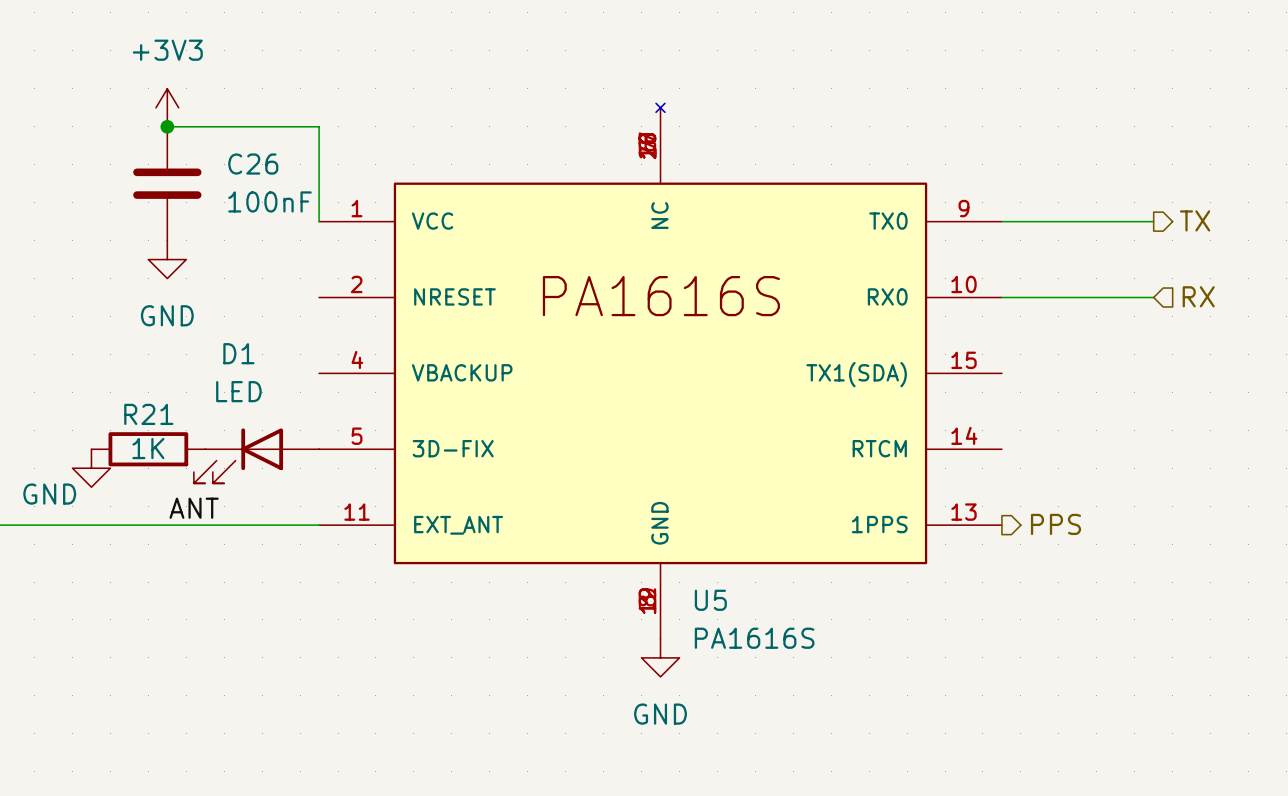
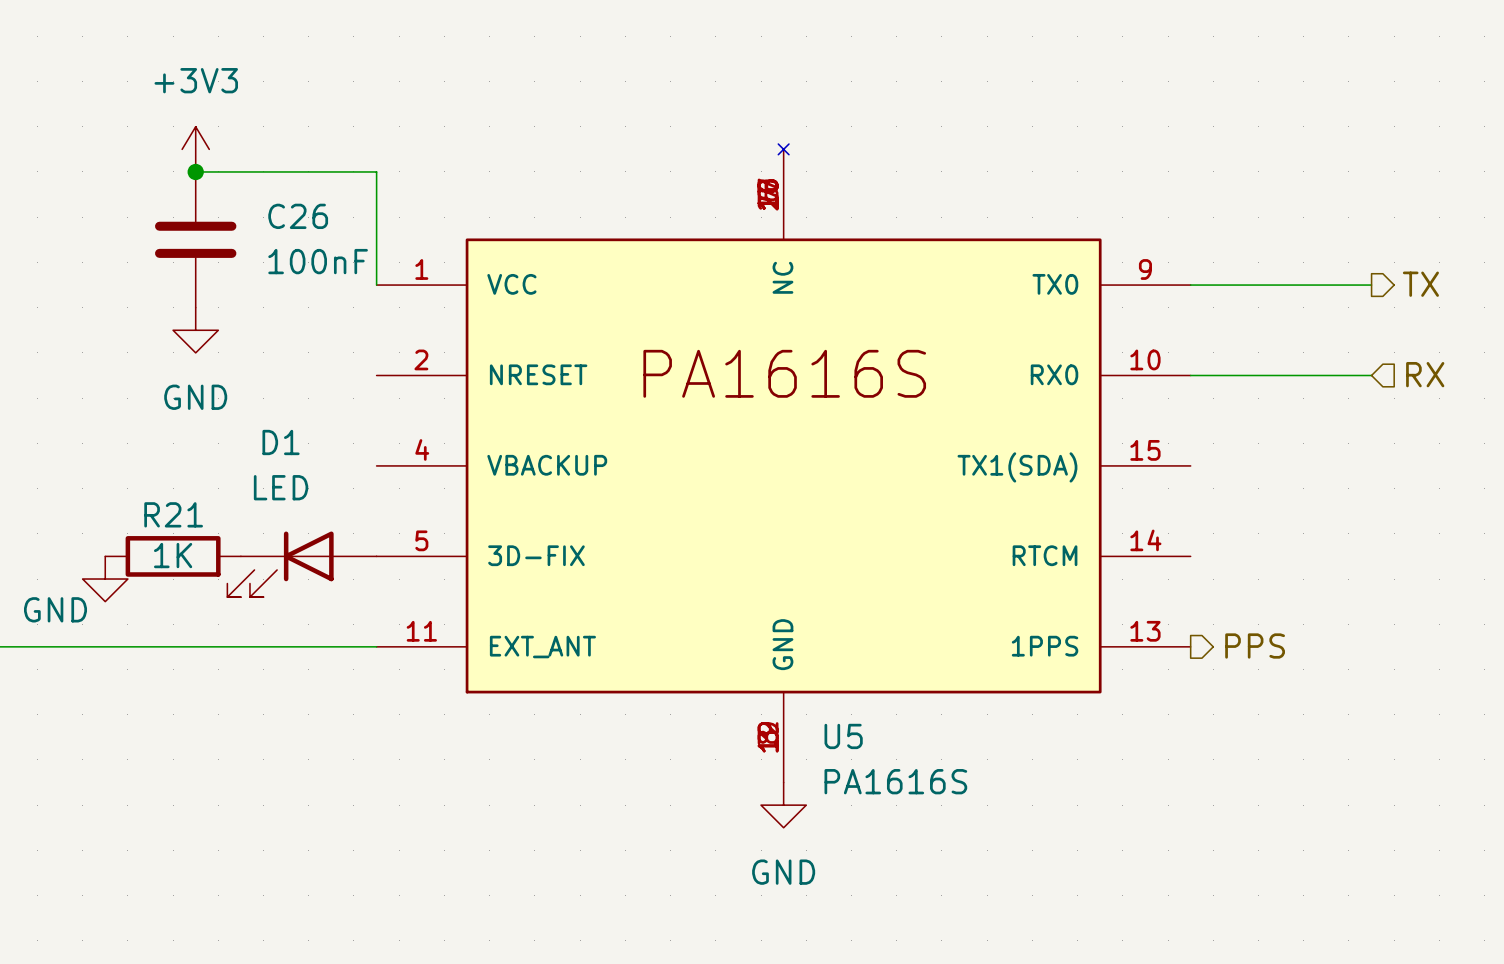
label: ANT (194, 508) -> none

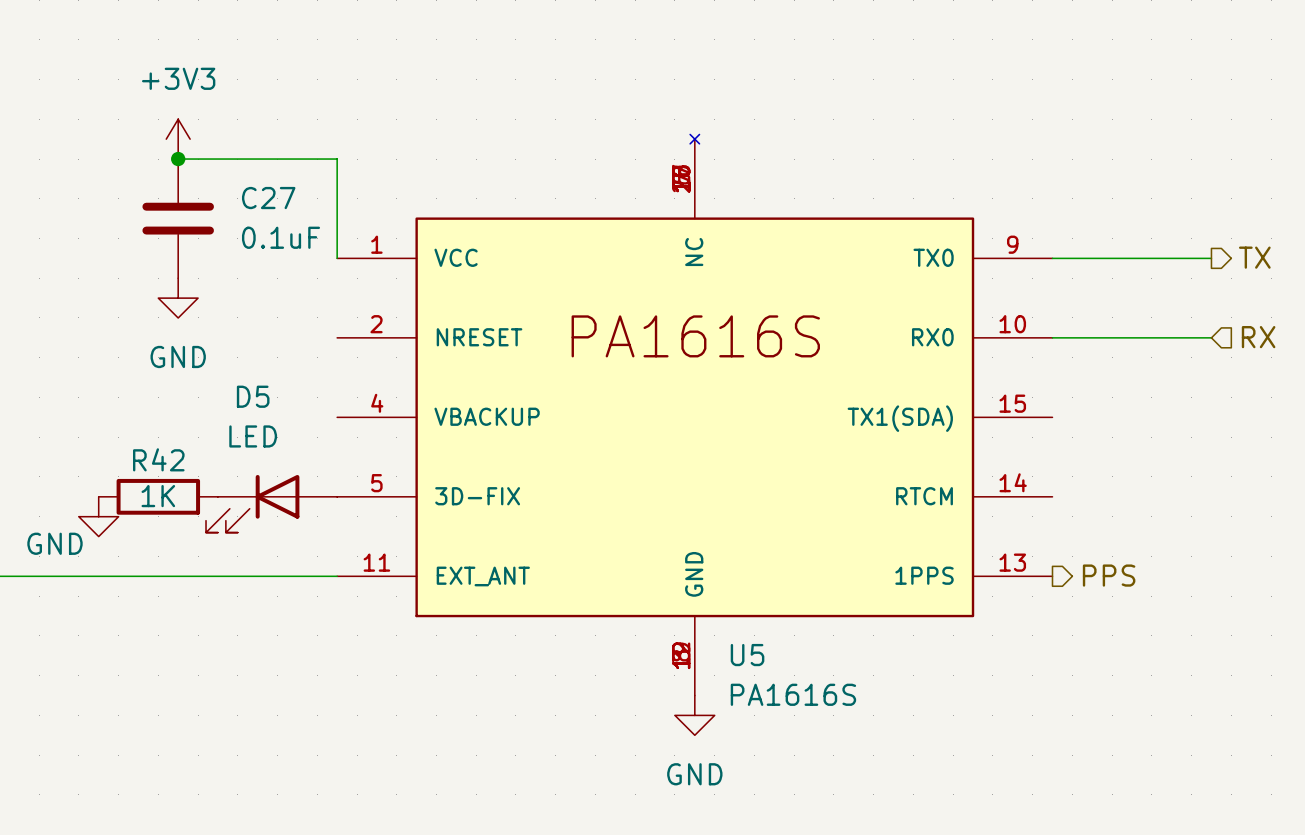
C26 name: C26 (298, 216) -> C27 (268, 198)
C26 value: 100nF (318, 261) -> 0.1uF (281, 237)
D1 name: D1 (281, 442) -> D5 (253, 396)
R21 name: R21 (173, 514) -> R42 (158, 459)

